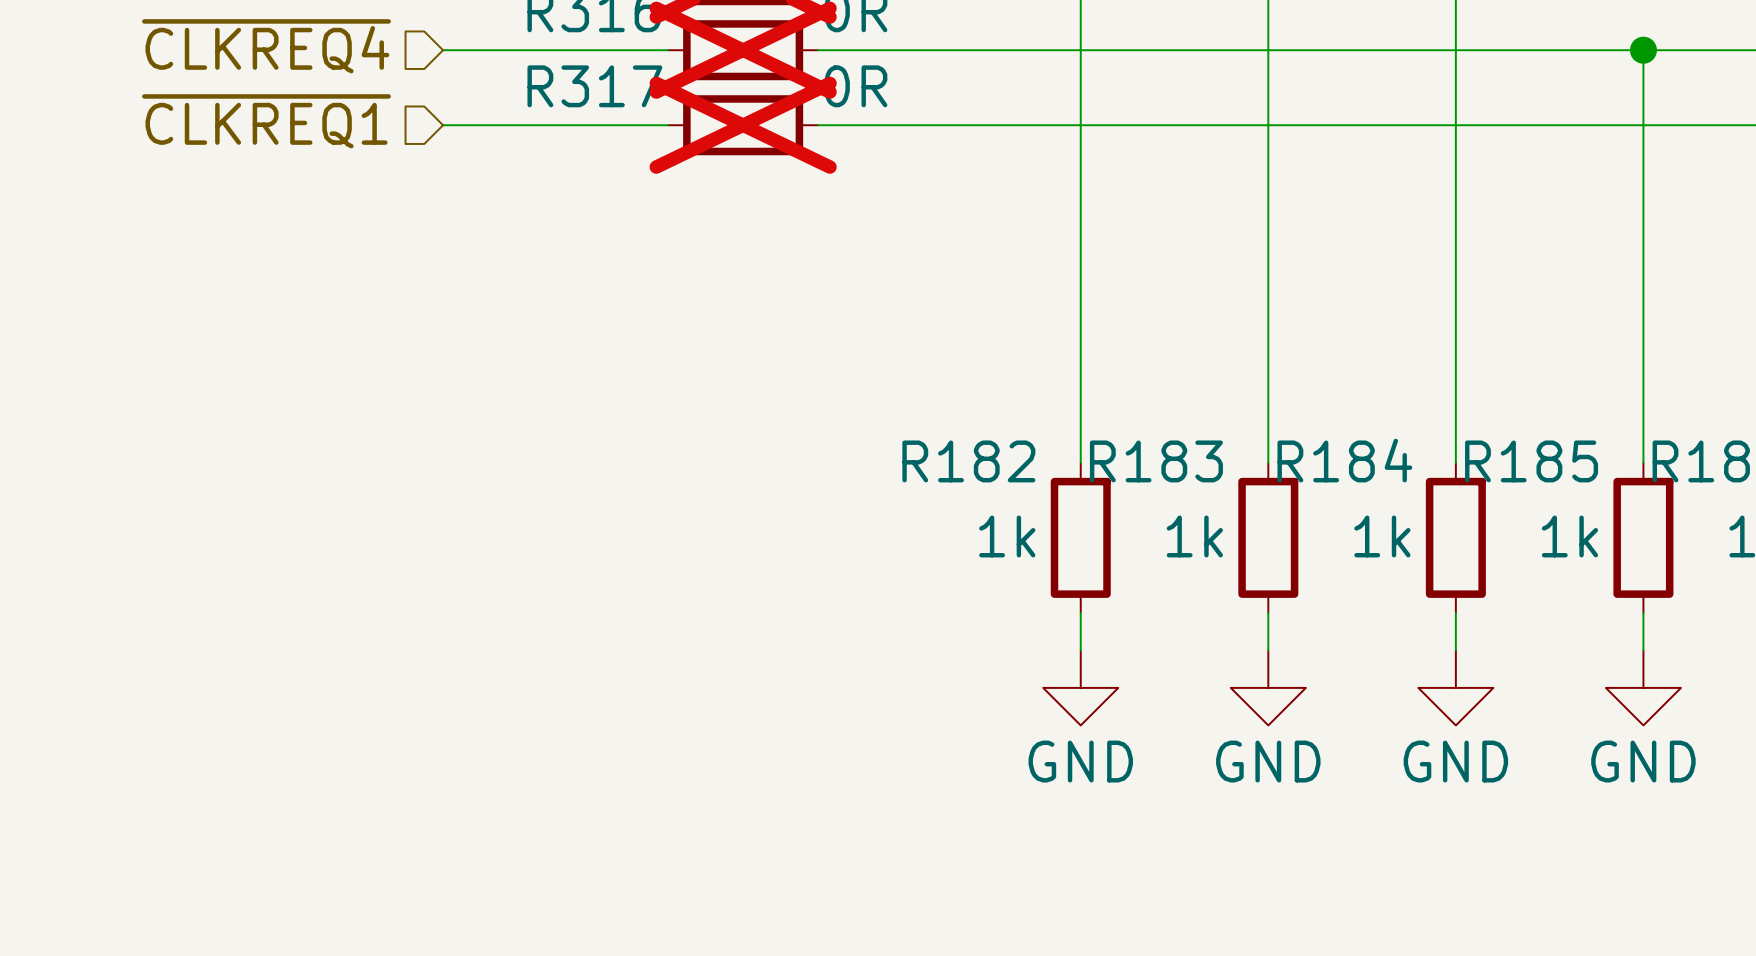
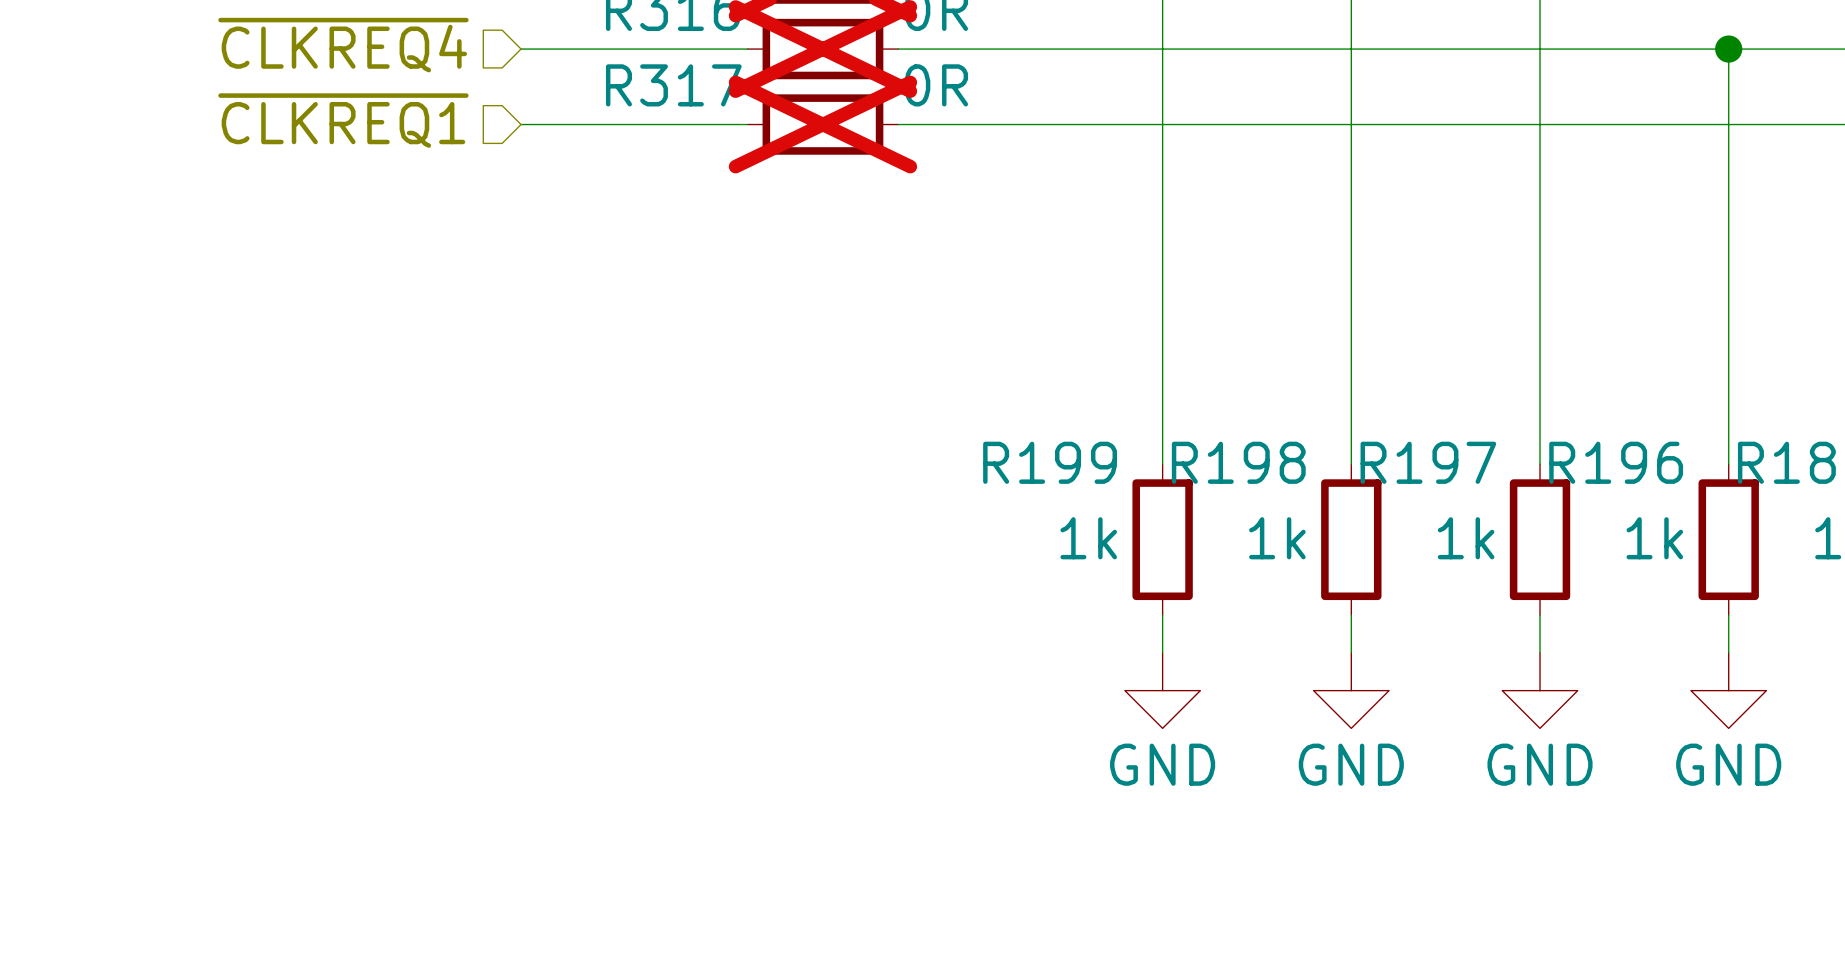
R184 name: R184 (1344, 460) -> R197 (1428, 462)
R182 name: R182 (968, 461) -> R199 (1050, 462)
R183 name: R183 (1156, 461) -> R198 (1238, 462)
R185 name: R185 (1531, 461) -> R196 (1616, 462)

